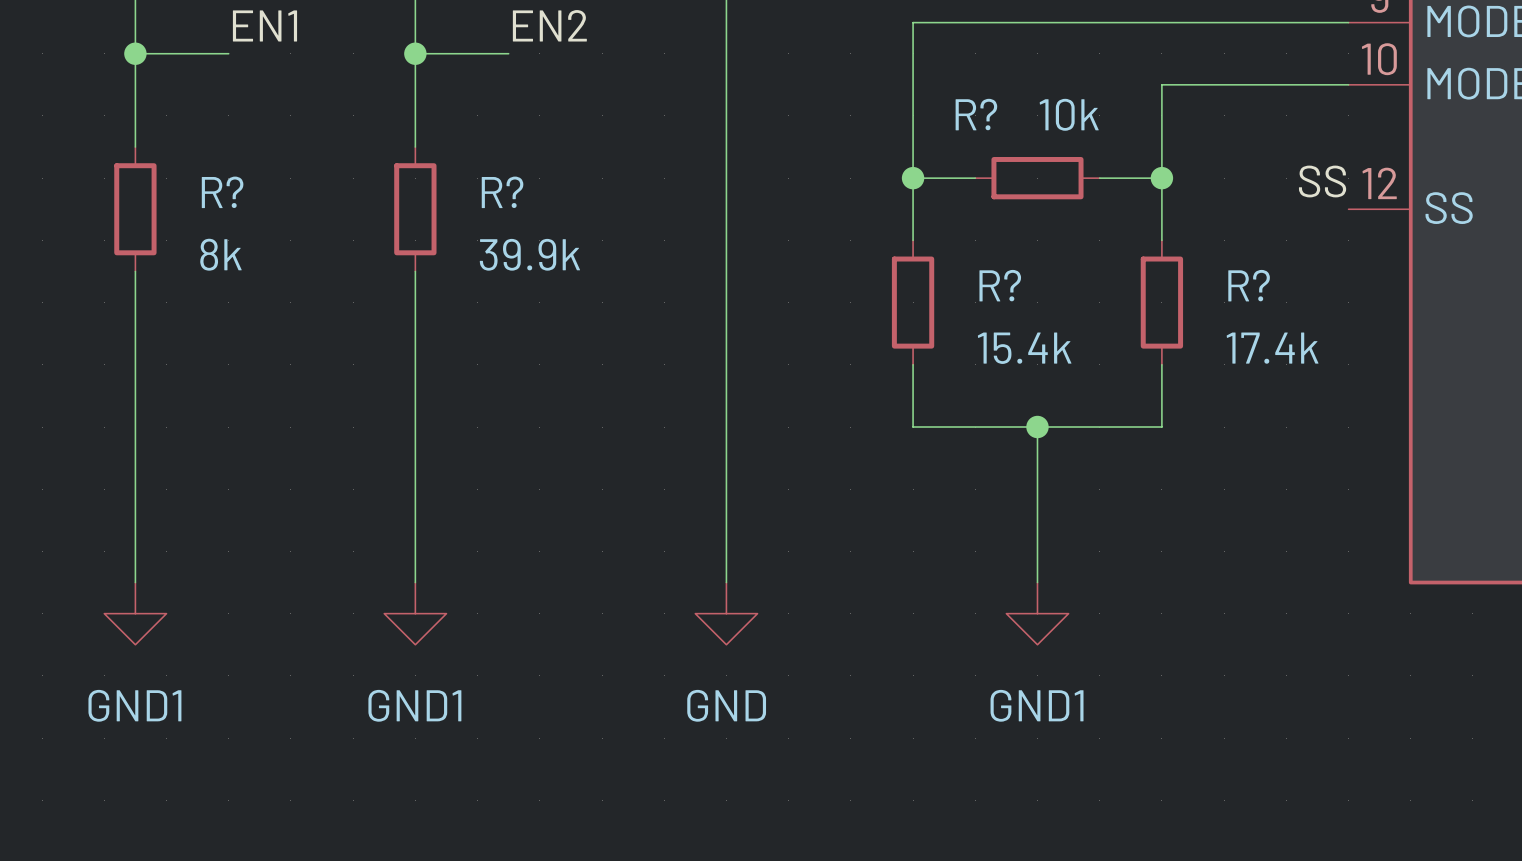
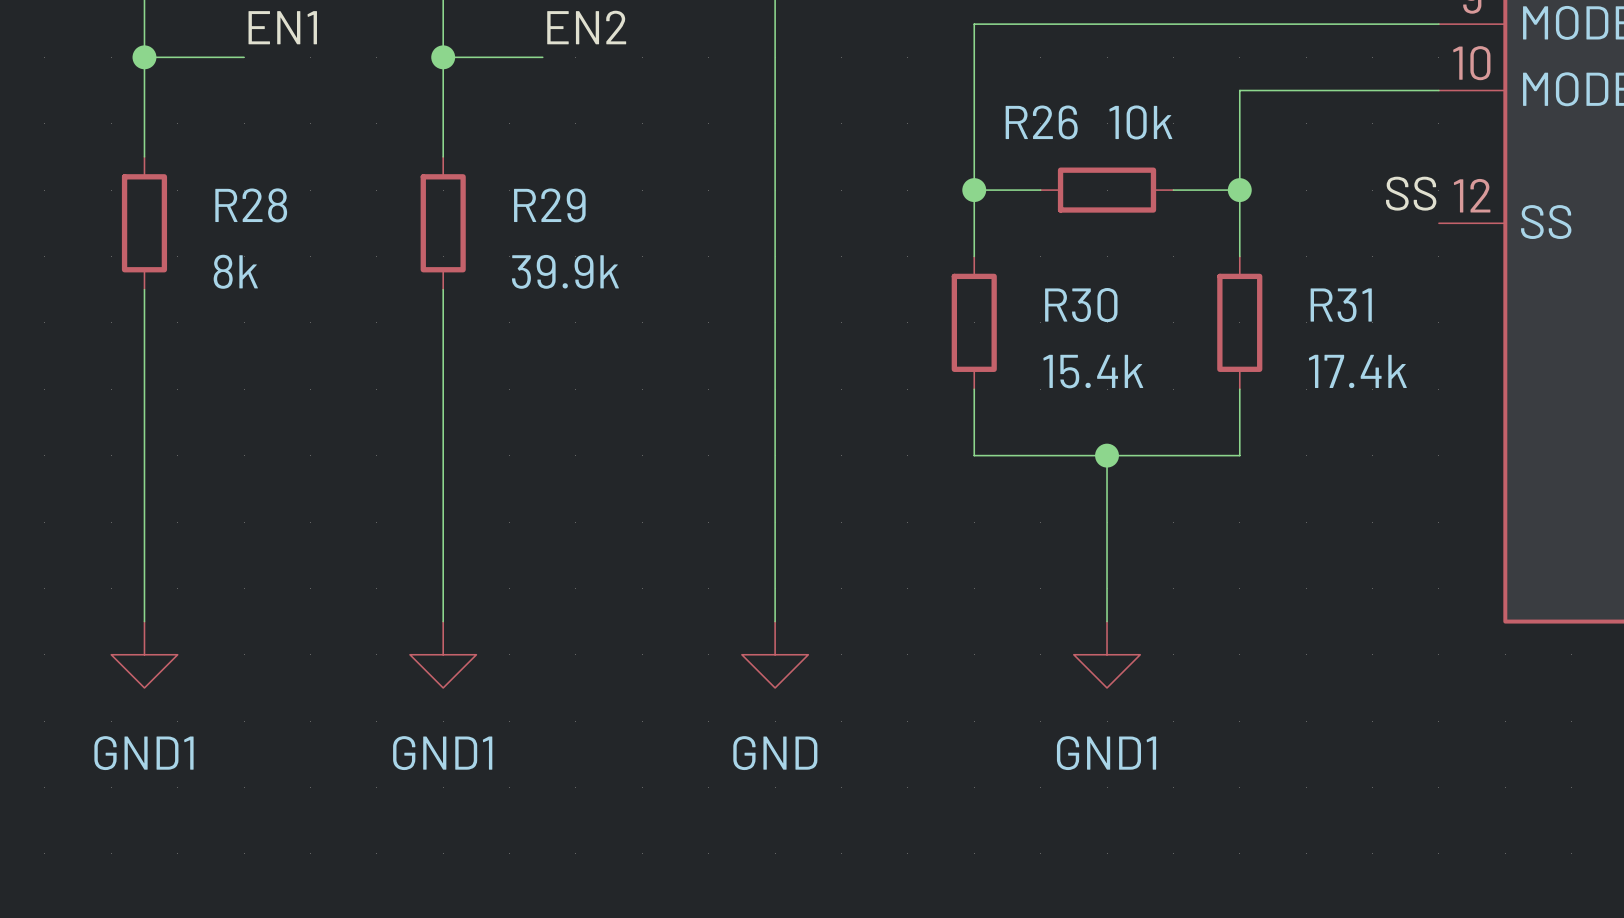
R? name: R? (976, 114) -> R26 (1041, 122)
R? name: R? (222, 192) -> R28 (251, 205)
R? name: R? (502, 192) -> R29 (549, 205)
R? name: R? (1000, 285) -> R30 (1081, 305)
R? name: R? (1249, 285) -> R31 (1341, 305)

